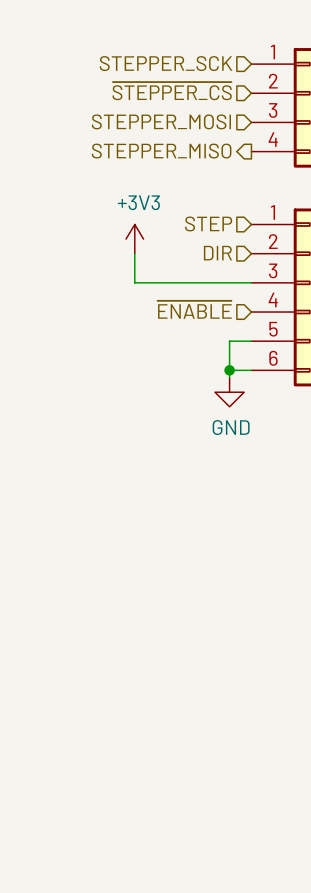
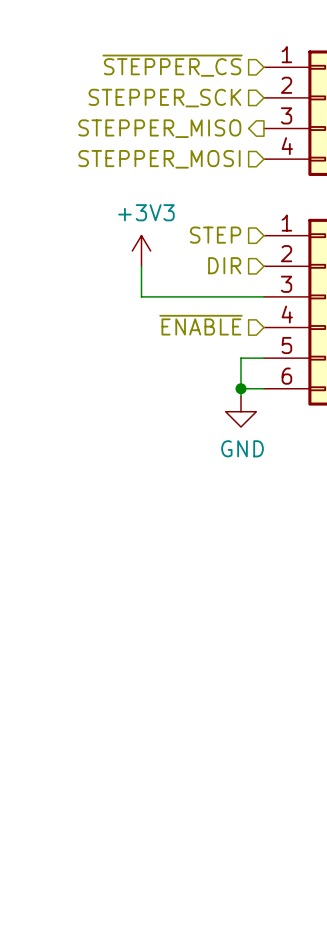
hierarchical label: STEPPER_SCK (166, 63) -> ~{STEPPER_CS} (172, 65)
hierarchical label: ~{STEPPER_CS} (172, 91) -> STEPPER_SCK (164, 98)
hierarchical label shape: input (161, 121) -> output (159, 128)
hierarchical label: STEPPER_MOSI (161, 121) -> STEPPER_MISO (159, 128)
hierarchical label shape: output (161, 151) -> input (159, 159)
hierarchical label: STEPPER_MISO (161, 151) -> STEPPER_MOSI (159, 159)

